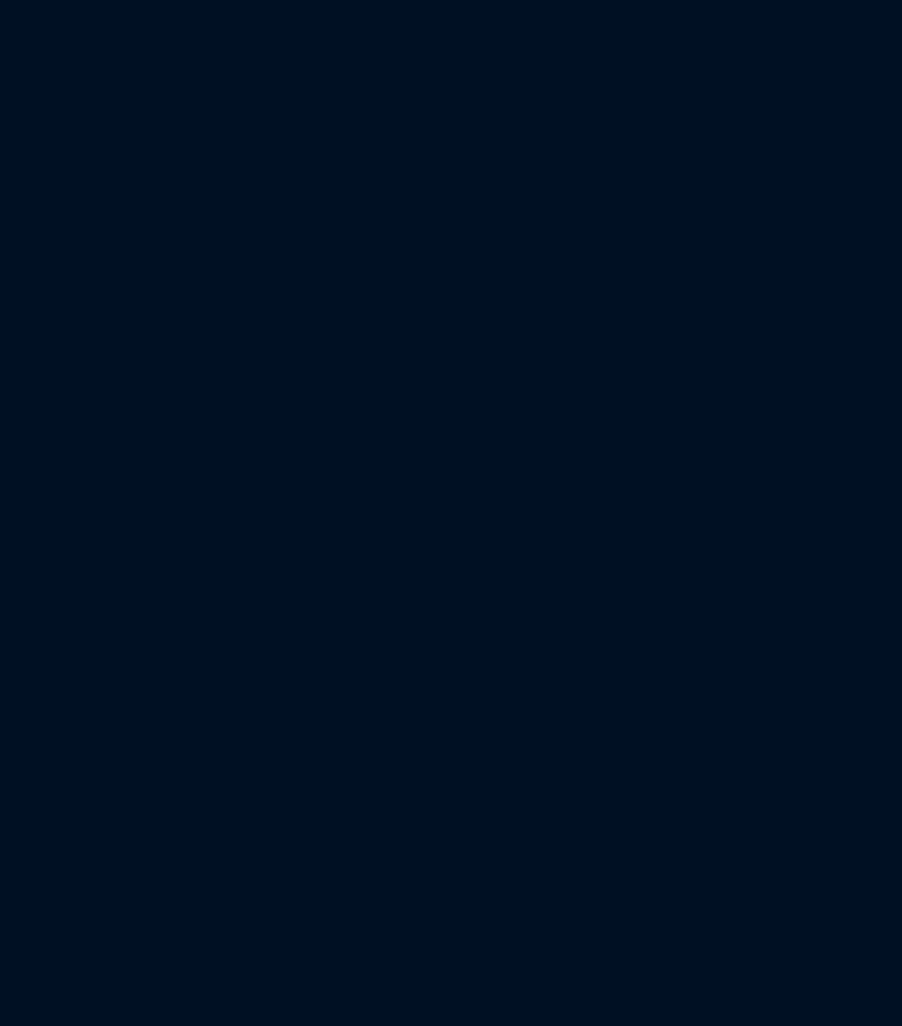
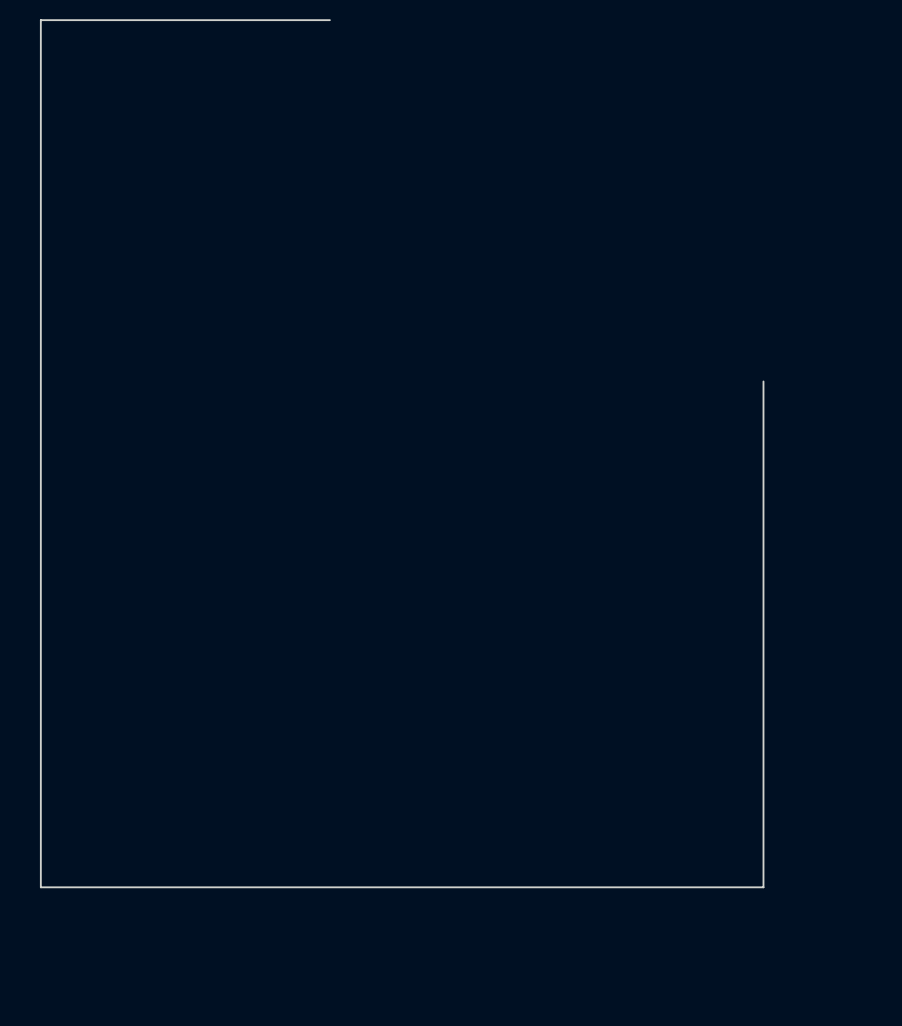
board edge: none -> (329, 20) (40, 20) (40, 887) (763, 887) (763, 381)

